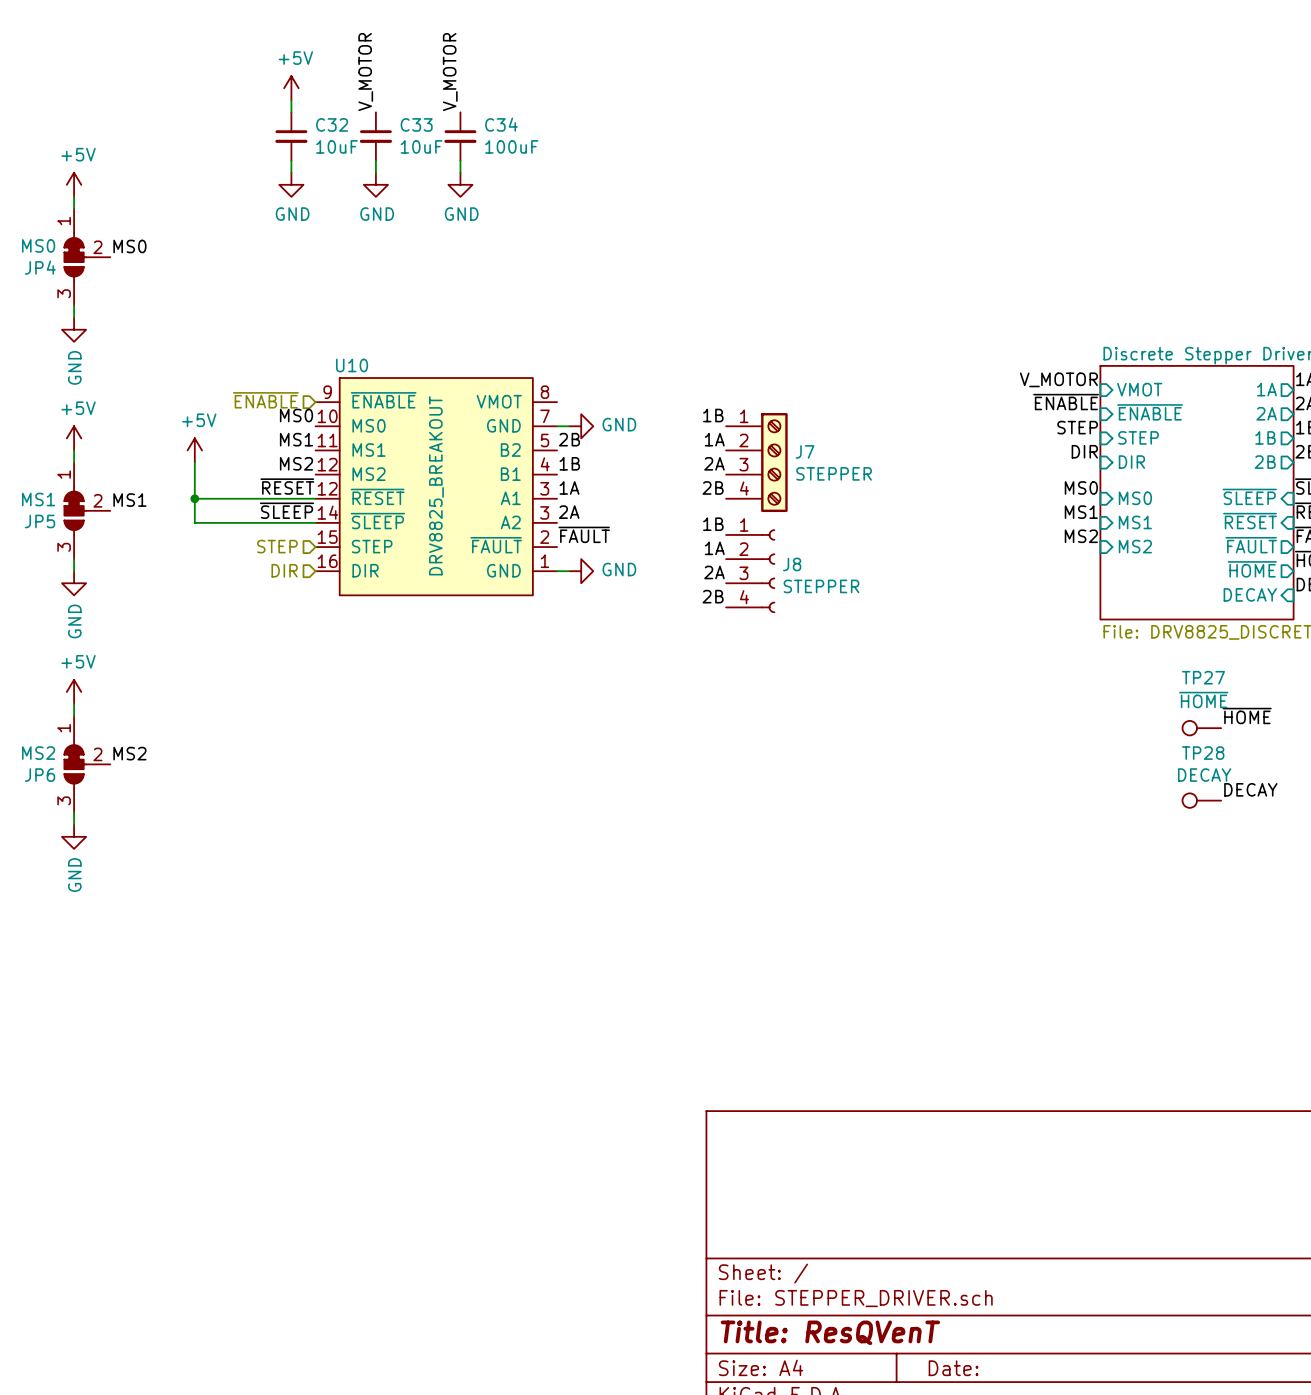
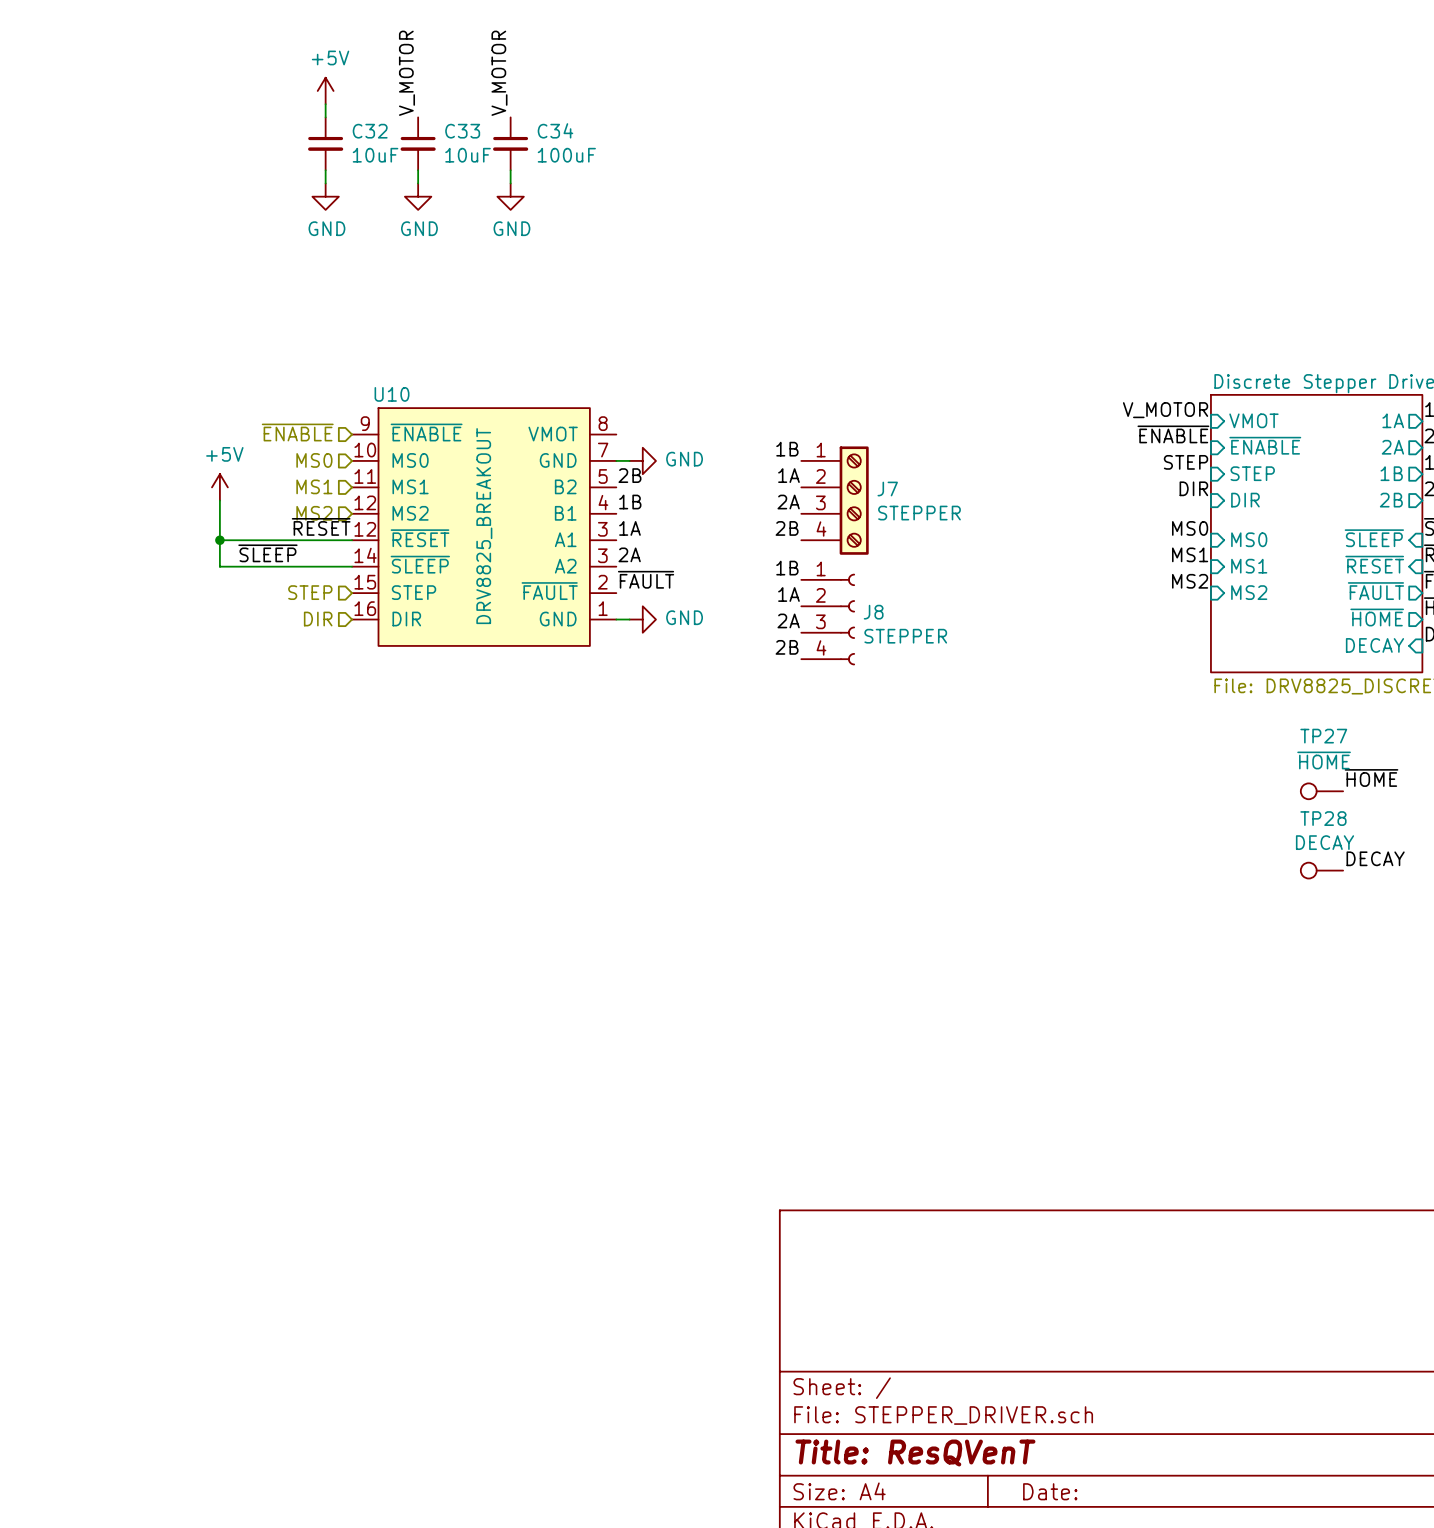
power symbol: +5V (74, 184) -> none
wire: (74, 196) (74, 208) -> none
label: MS0 (129, 246) -> none
JP4: MS0 (87, 257) -> none
wire: (74, 305) (74, 317) -> none
power symbol: GND (74, 329) -> none
label: MS0 (296, 415) -> none
hierarchical label: none -> MS0 (314, 460)
power symbol: +5V (74, 438) -> none
label: MS1 (296, 439) -> none
wire: (74, 450) (74, 462) -> none
hierarchical label: none -> MS1 (314, 486)
label: MS2 (296, 463) -> none
hierarchical label: none -> MS2 (314, 513)
label: MS1 (129, 500) -> none
JP5: MS1 (87, 510) -> none
label position: ~{SLEEP} (287, 510) -> ~{SLEEP} (267, 553)
wire: (74, 559) (74, 571) -> none
power symbol: GND (74, 583) -> none
power symbol: +5V (74, 691) -> none
wire: (74, 704) (74, 716) -> none
label: MS2 (129, 753) -> none
JP6: MS2 (87, 764) -> none
wire: (74, 812) (74, 824) -> none
power symbol: GND (74, 836) -> none

